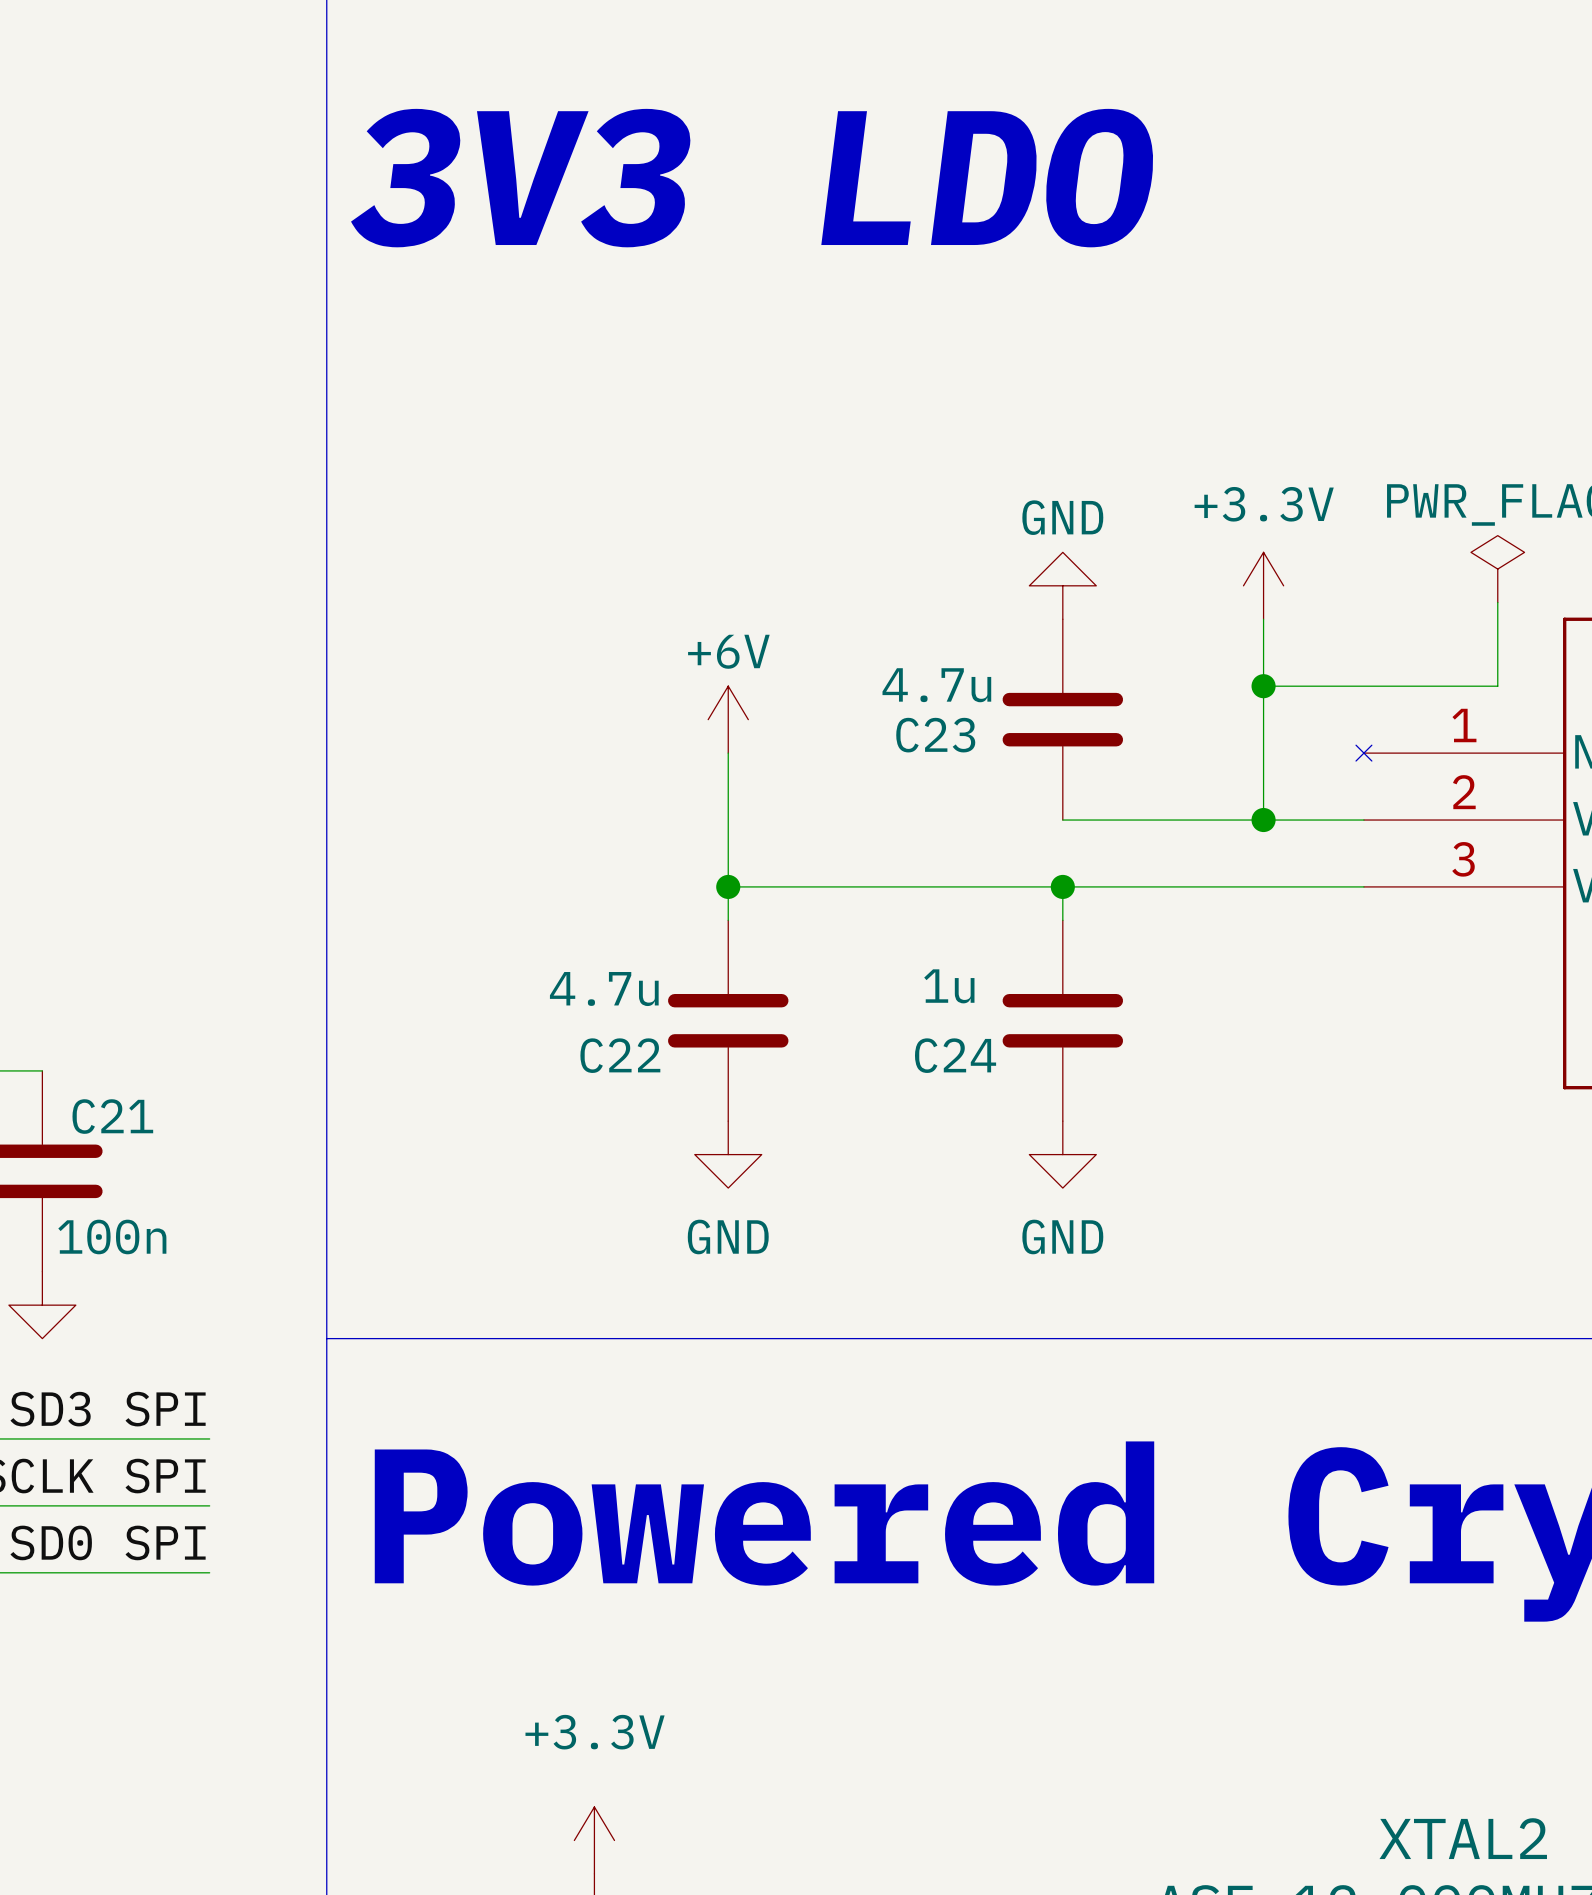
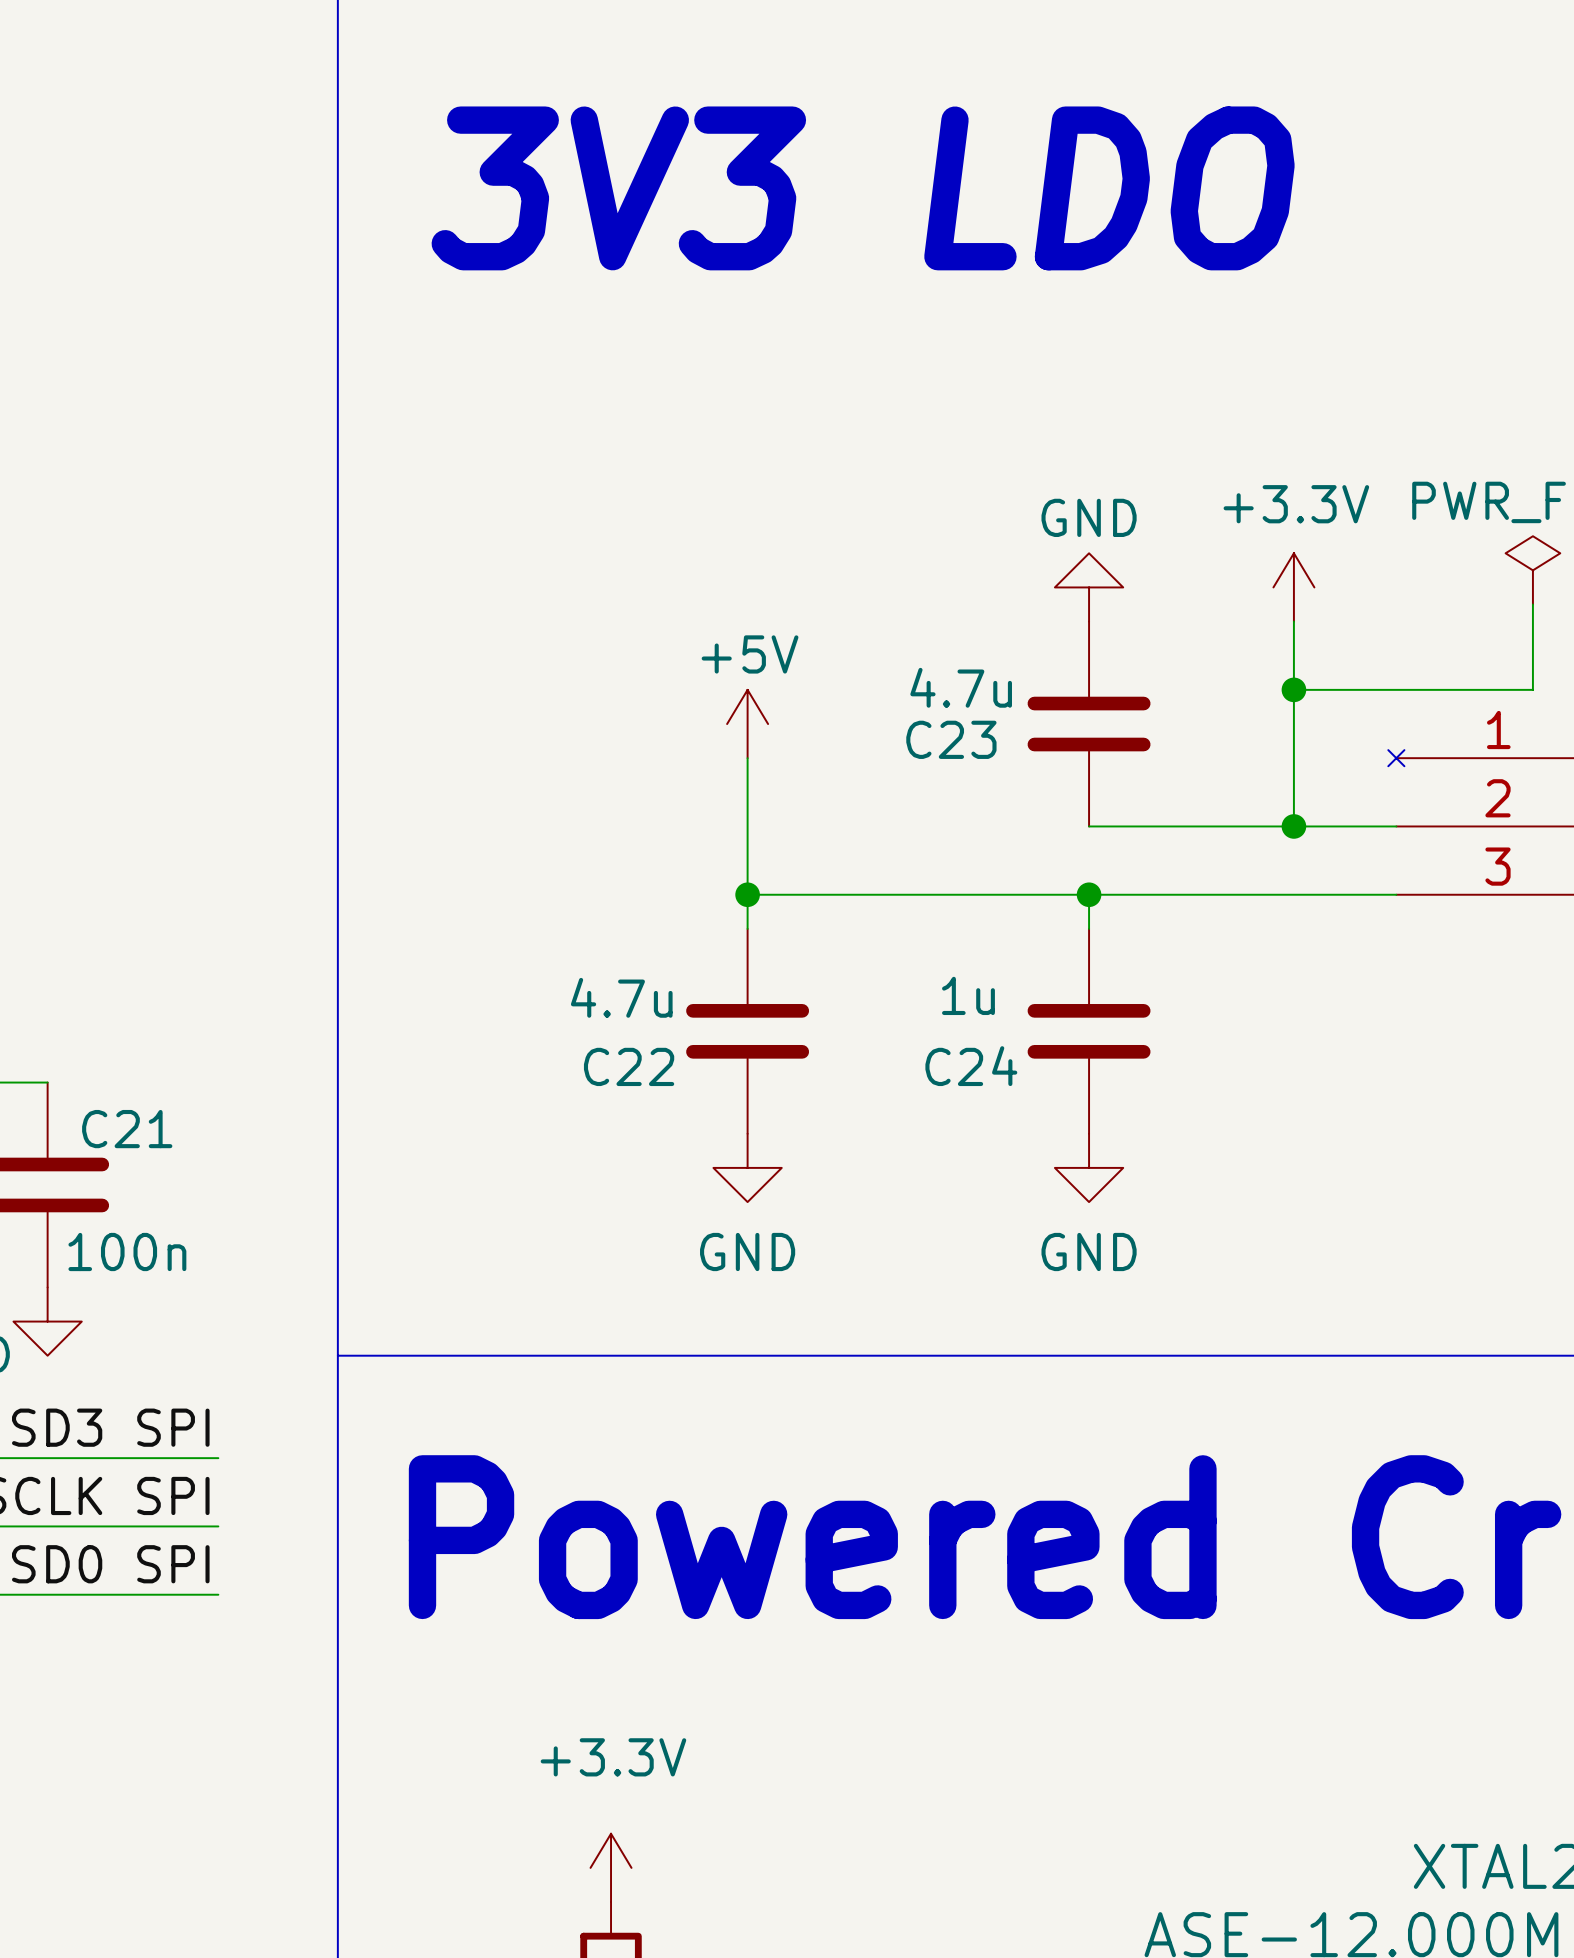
text position: 3V3 LDO (753, 178) -> 3V3 LDO (863, 188)
power symbol: +6V (728, 719) -> +5V (747, 724)

